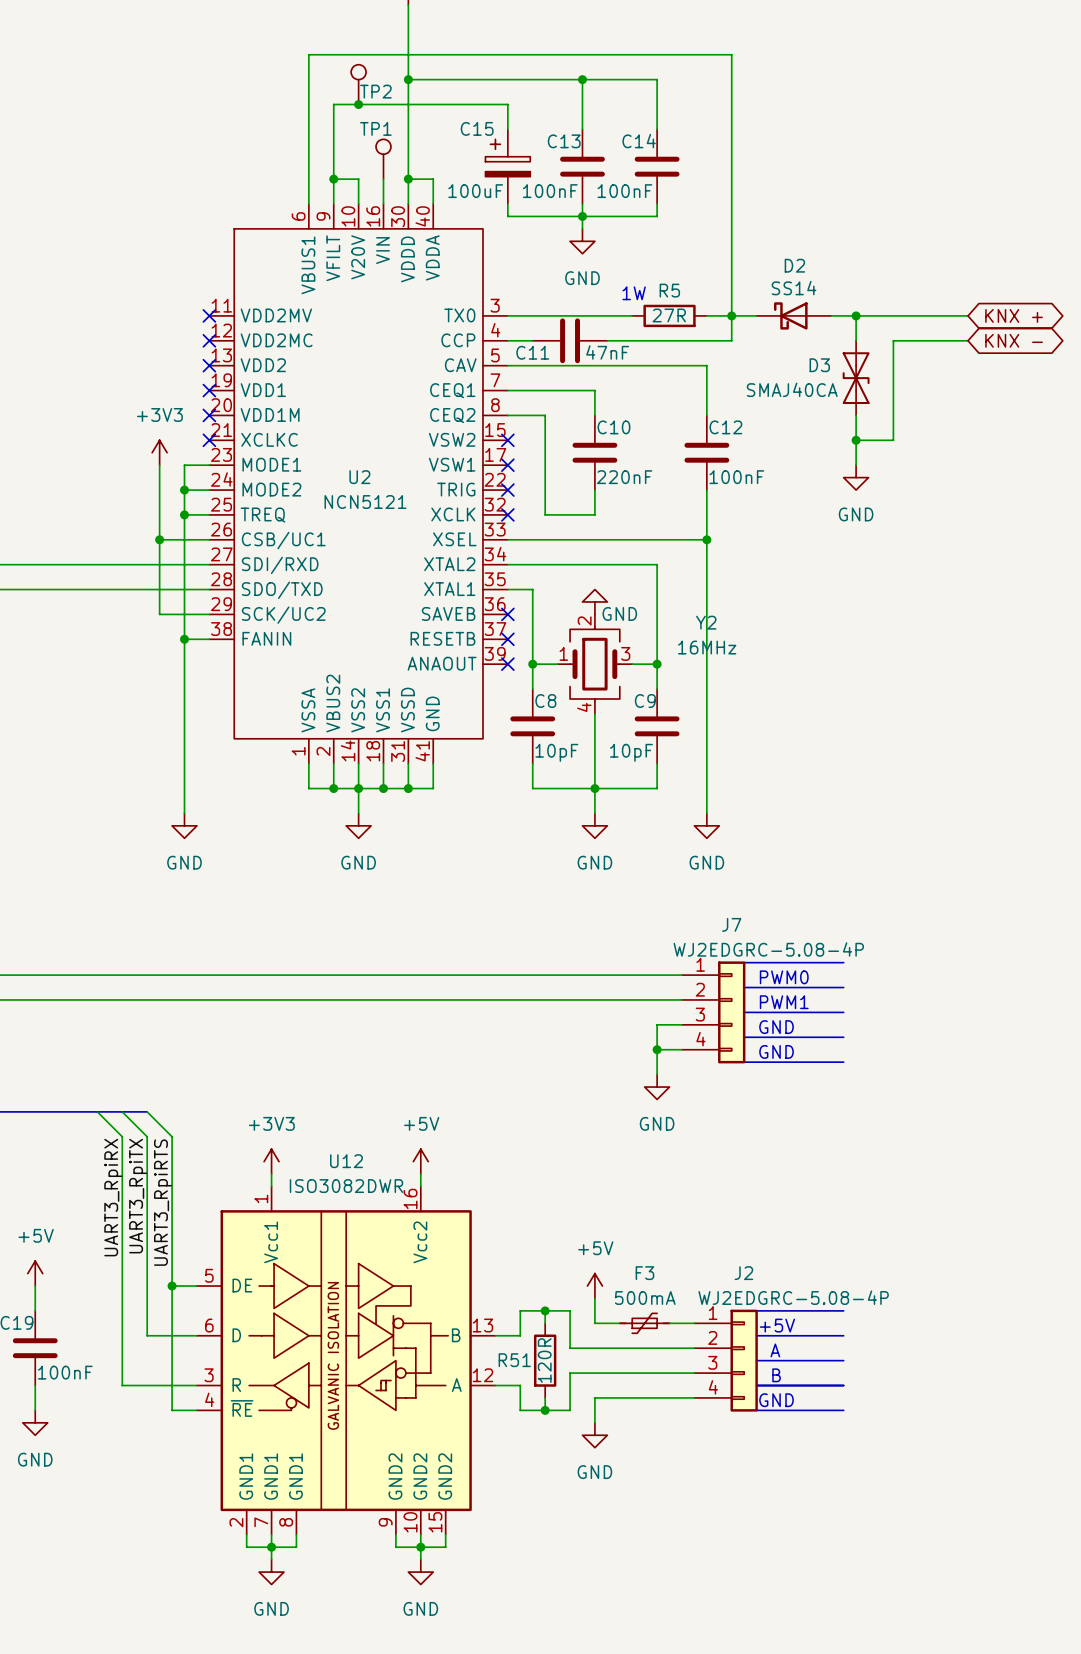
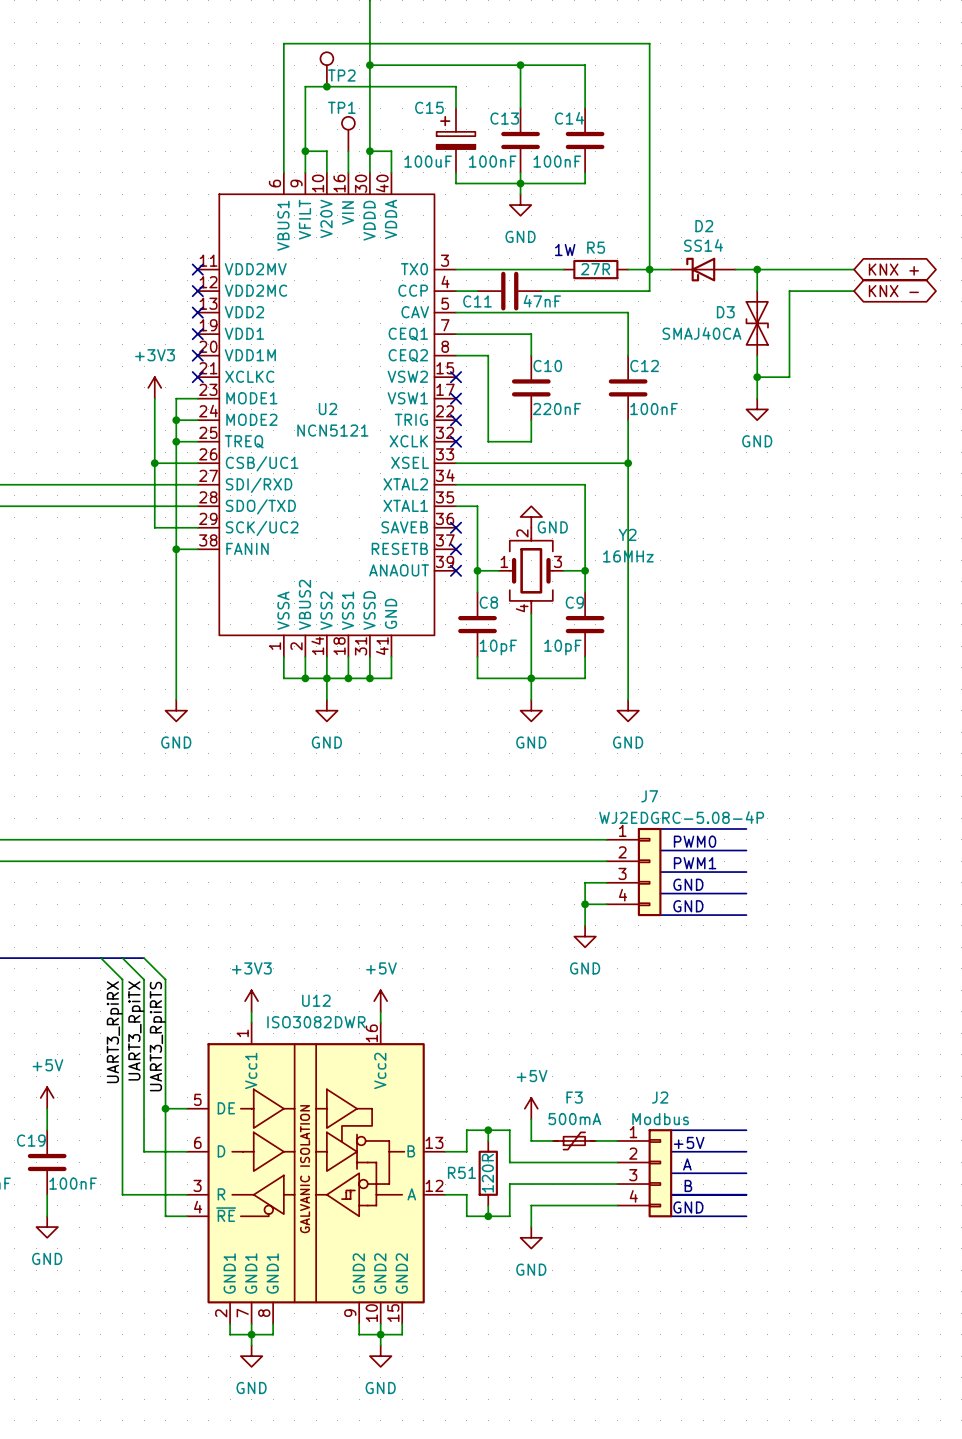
J2 value: WJ2EDGRC-5.08-4P (793, 1297) -> Modbus (660, 1119)

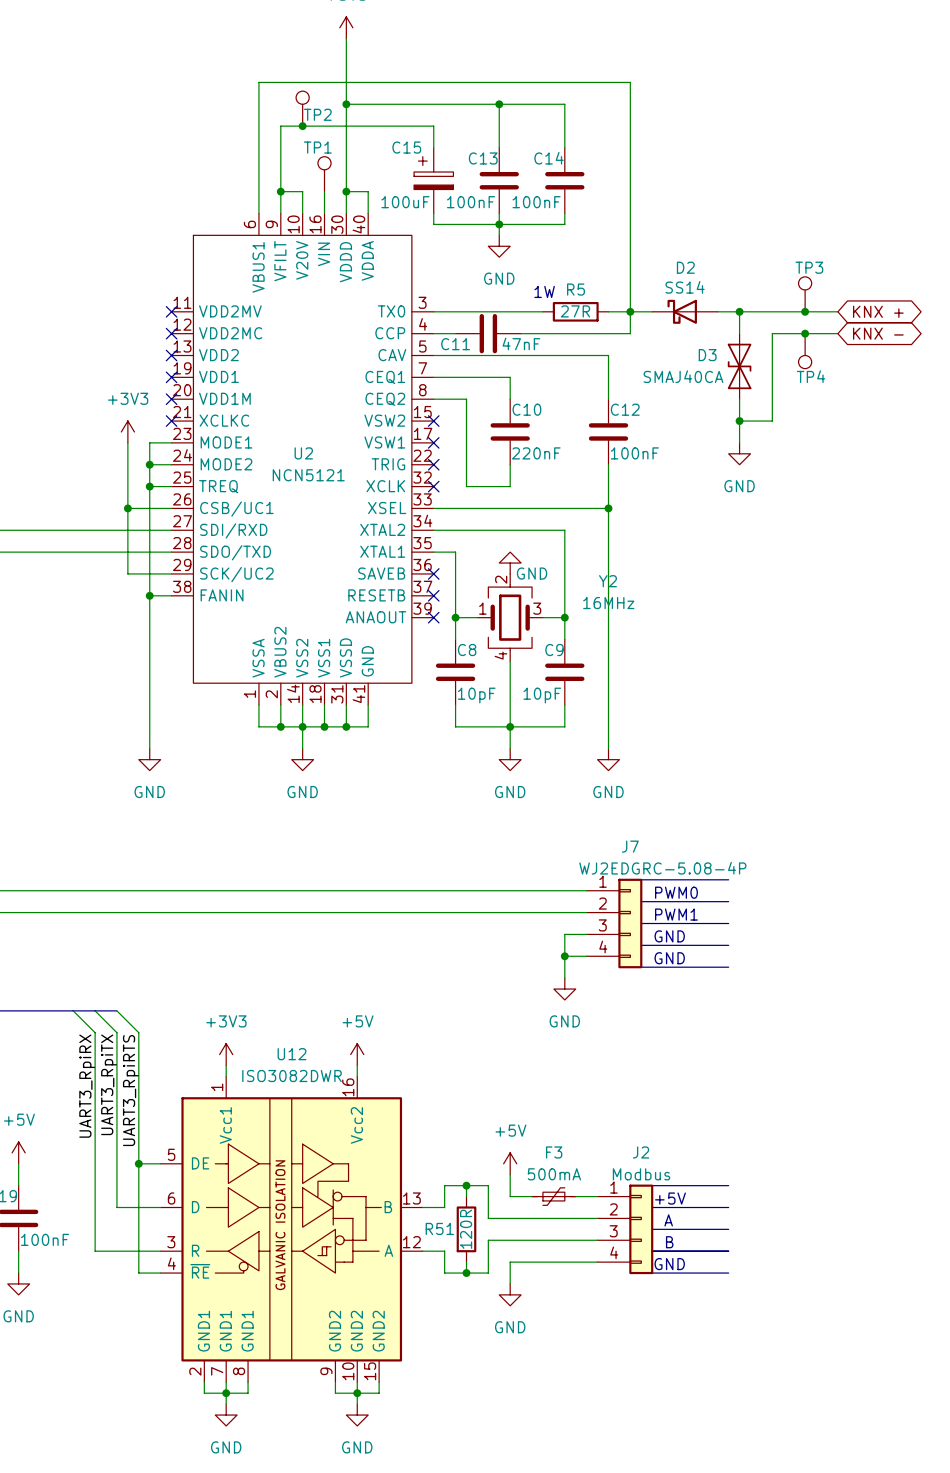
TP3: none -> (805, 294)
junction: none -> (805, 311)
junction: none -> (805, 333)
TP4: none -> (805, 351)

